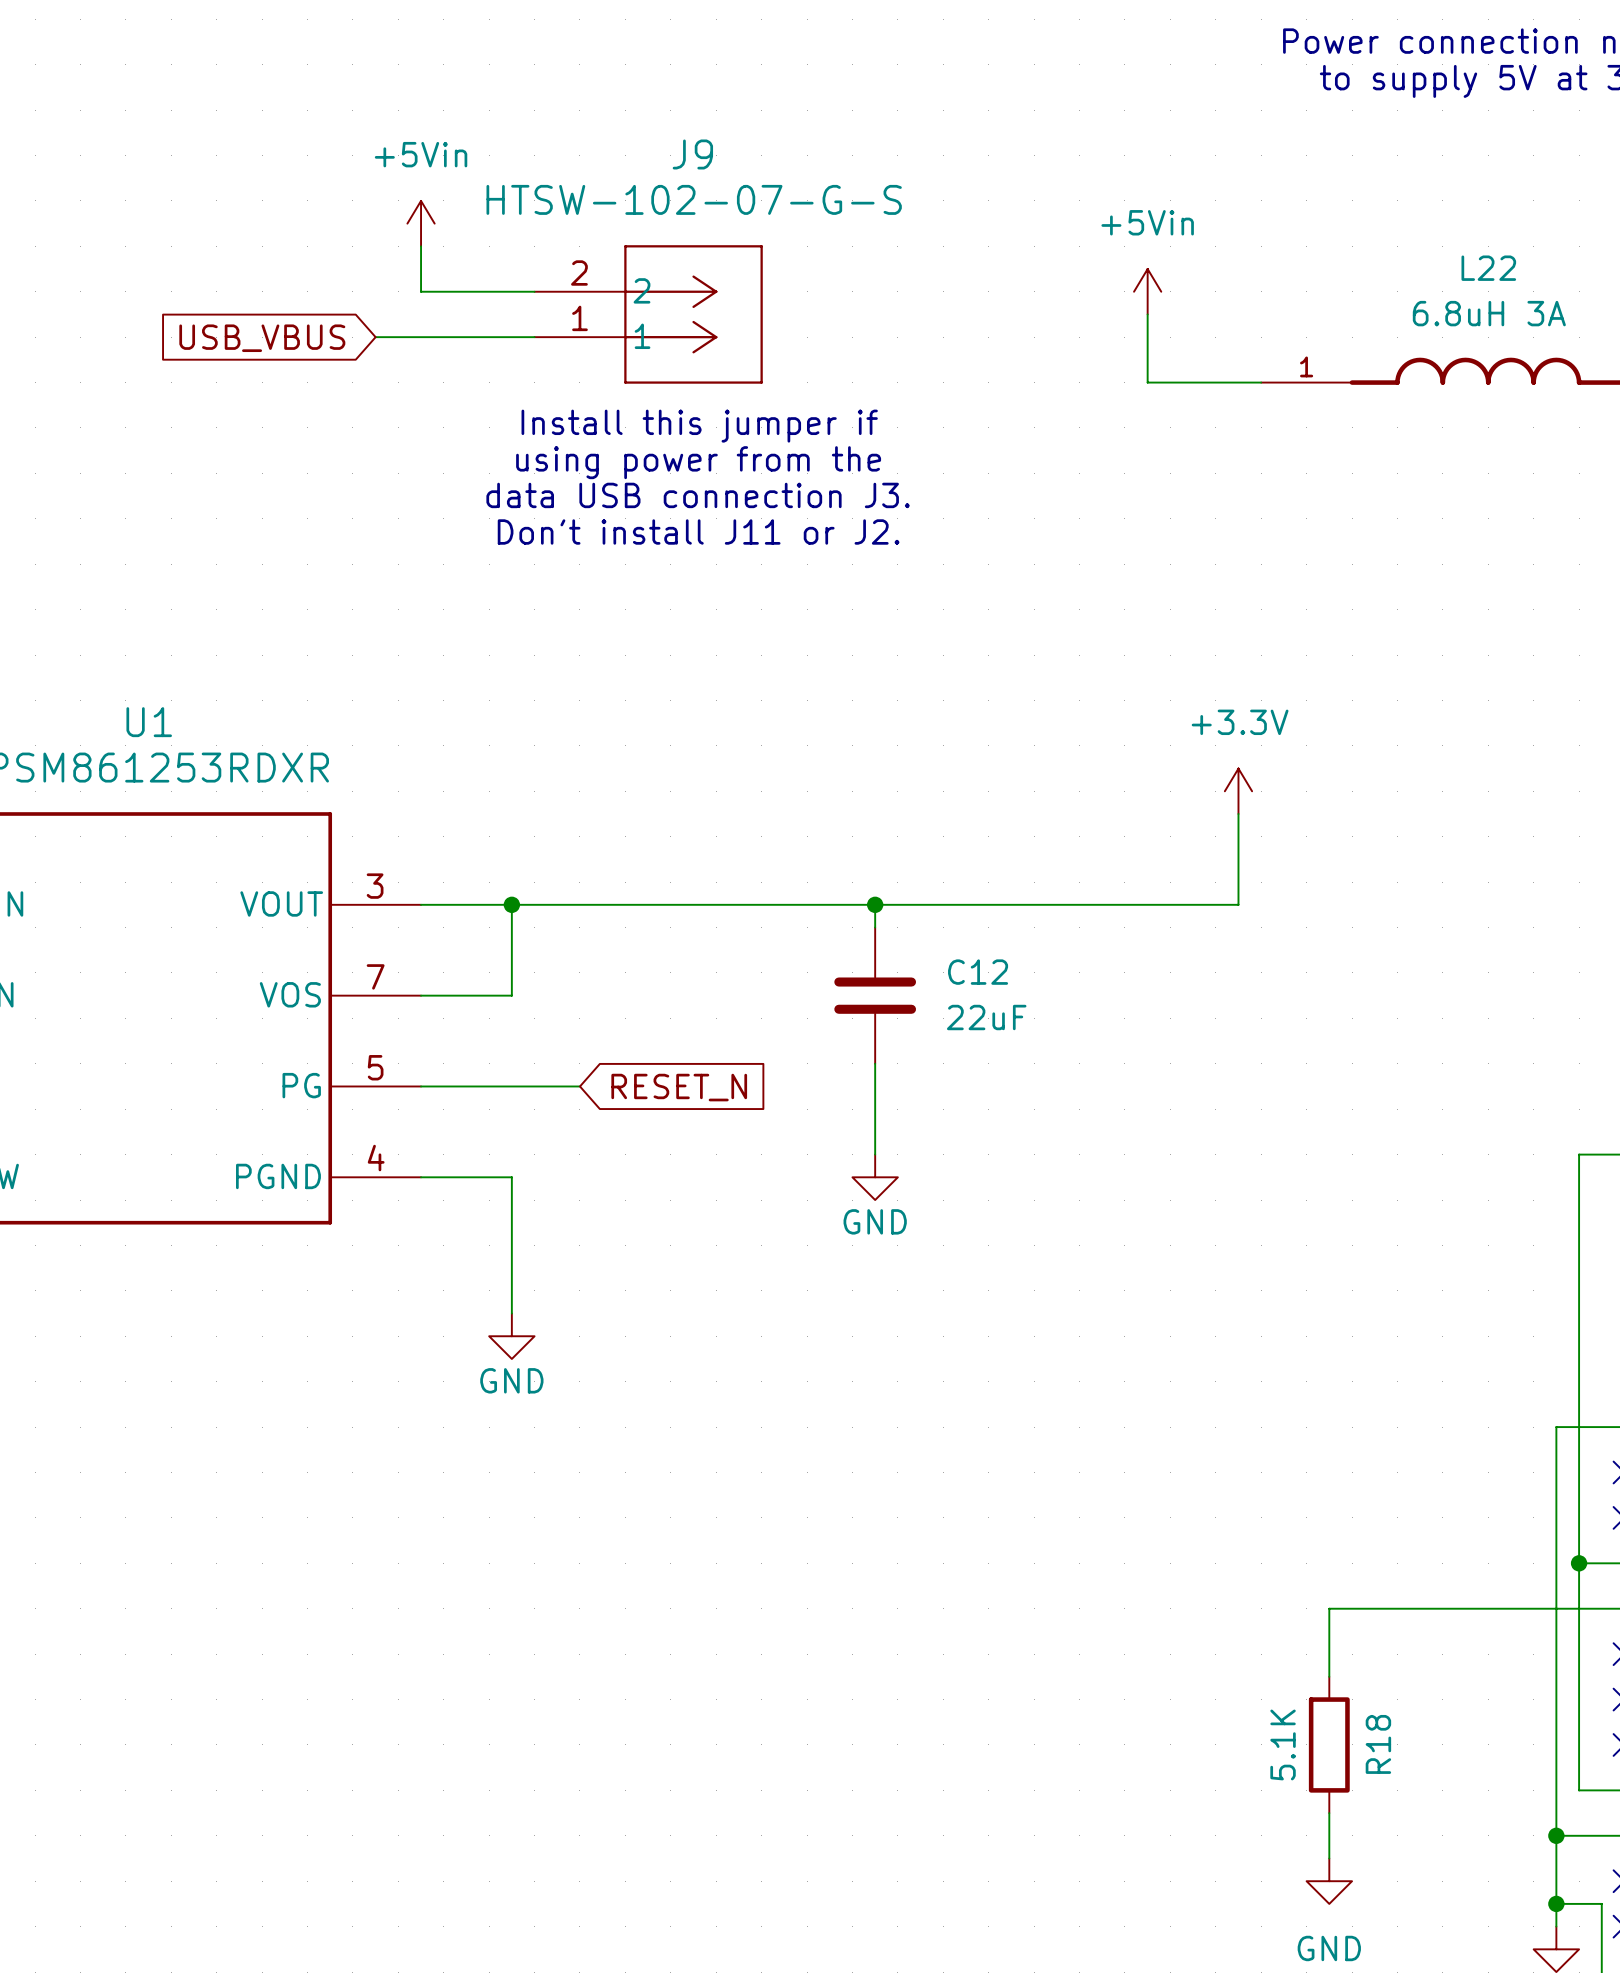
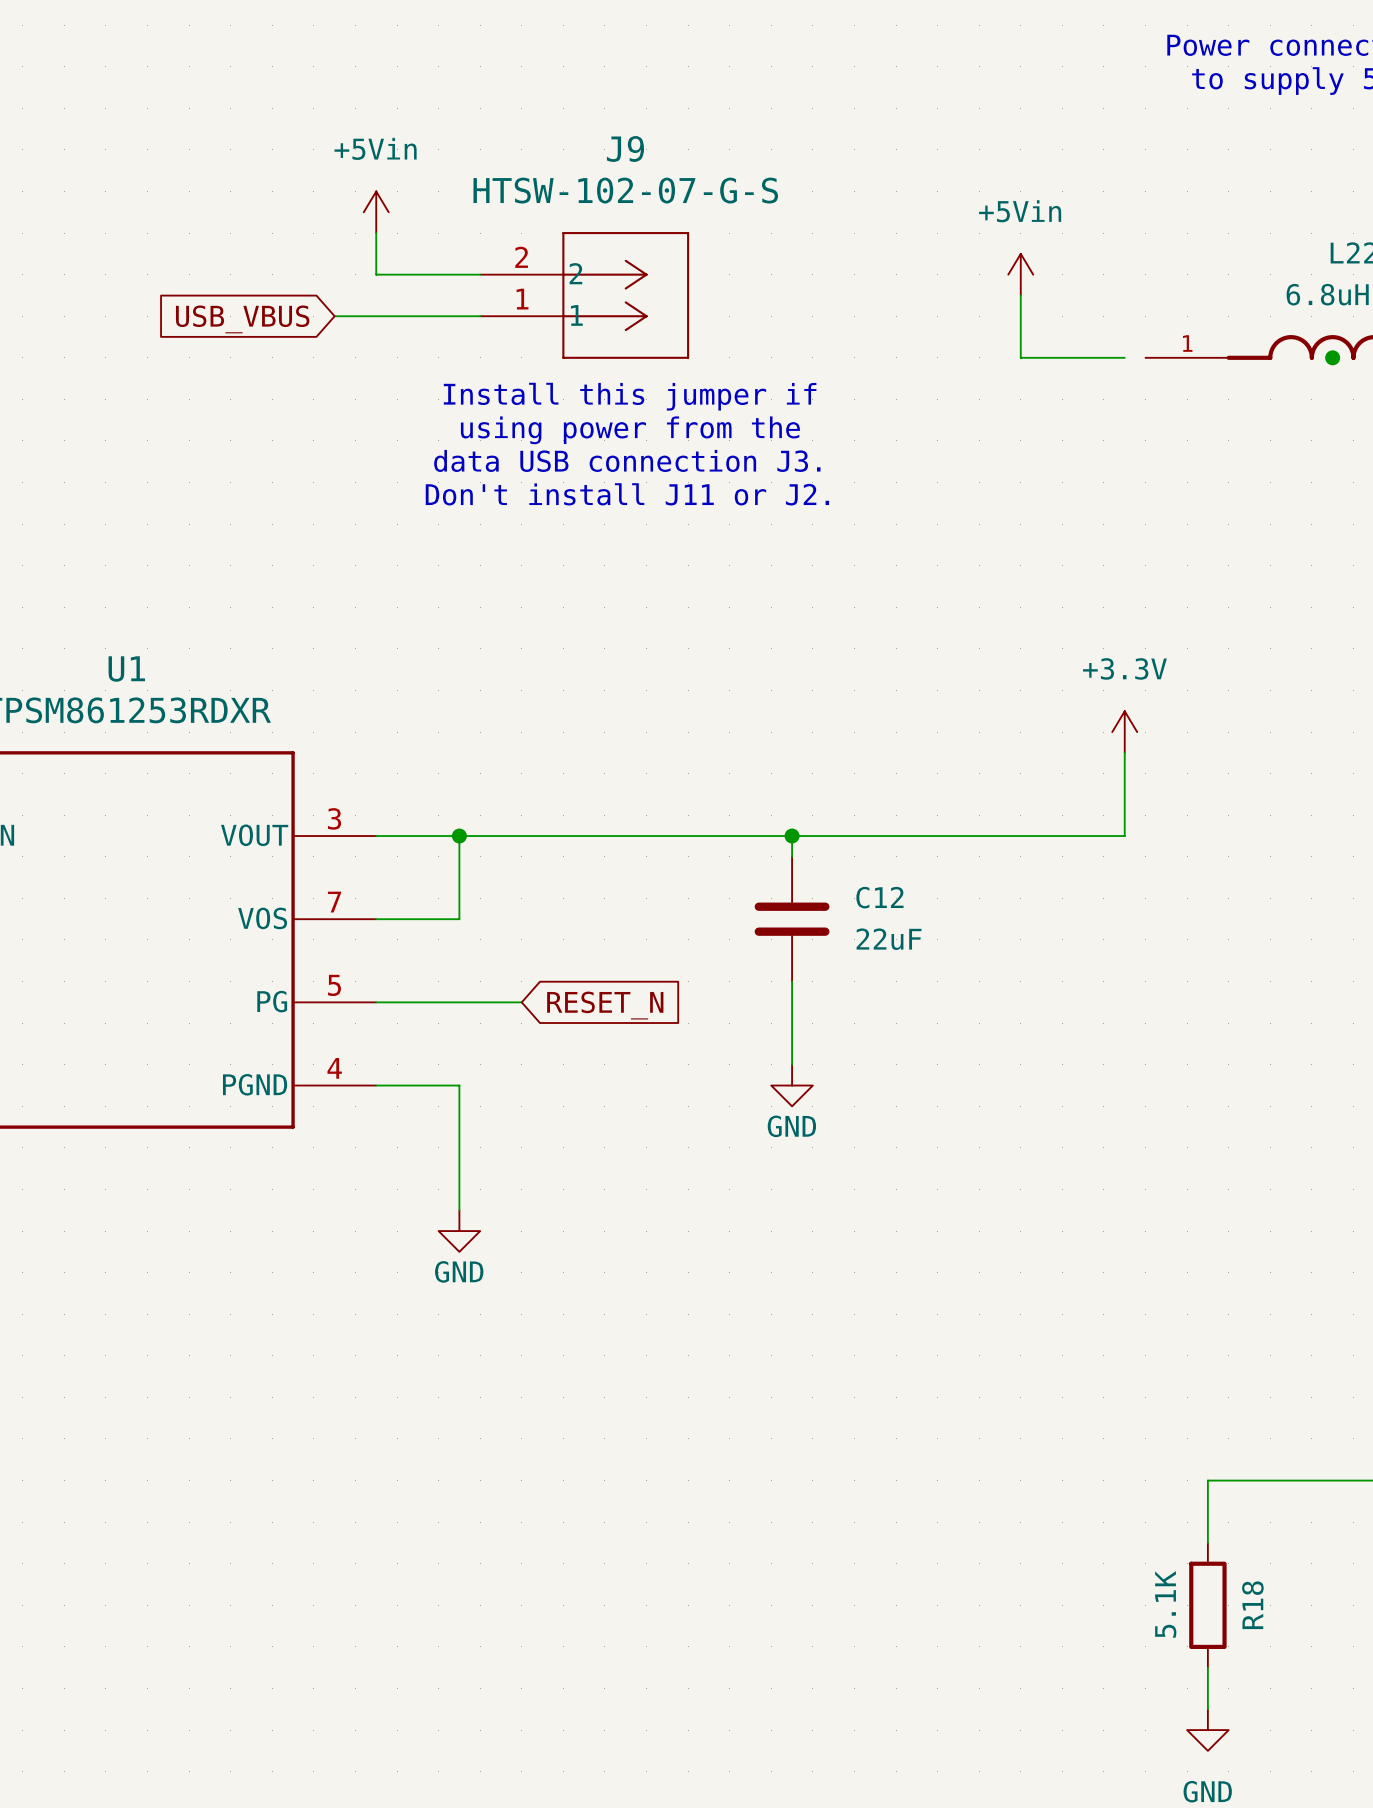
power symbol position: +5Vin (1147, 291) -> +5Vin (1020, 274)
wire: (1147, 314) (1147, 382) -> (1020, 295) (1020, 357) (1041, 357)
wire: (1238, 382) (1261, 382) -> none
junction: none -> (1332, 357)

